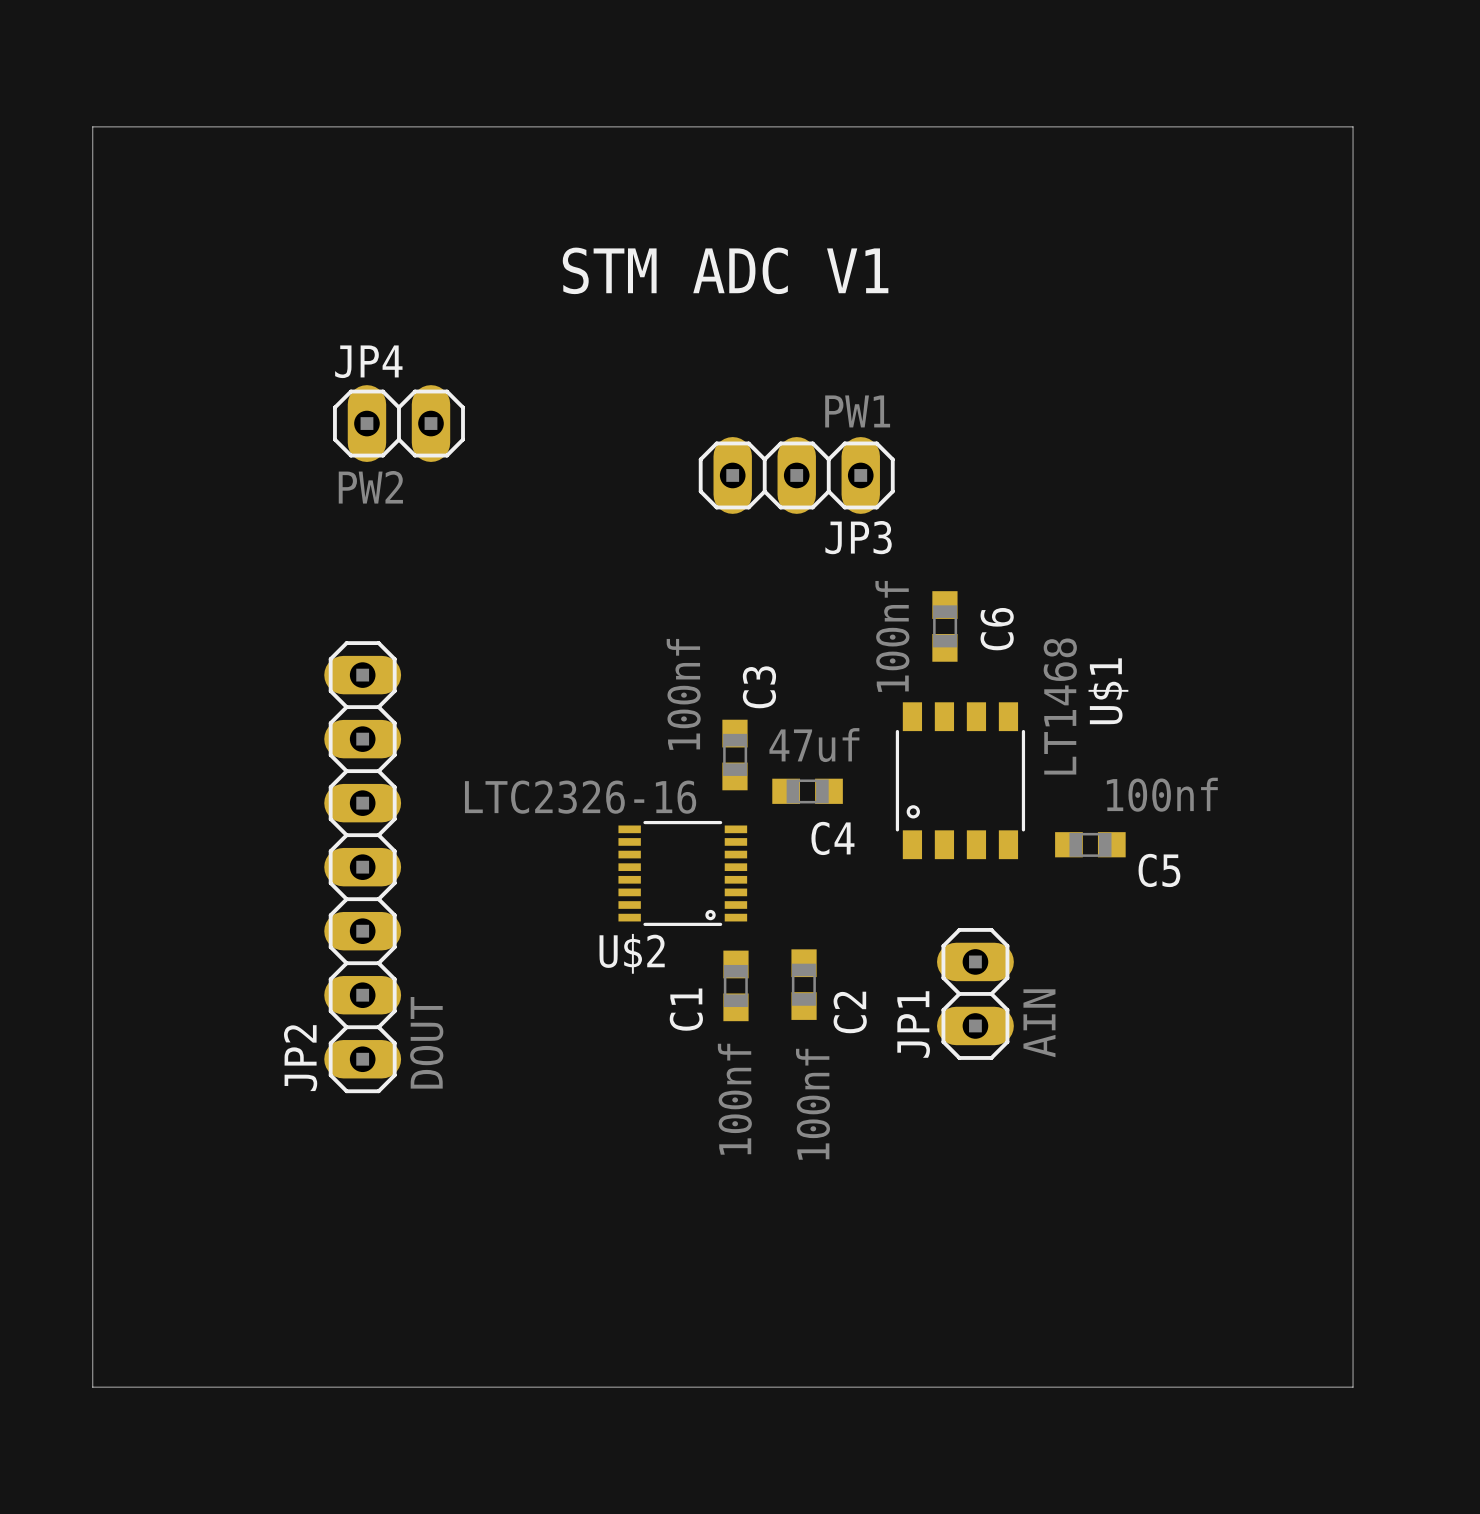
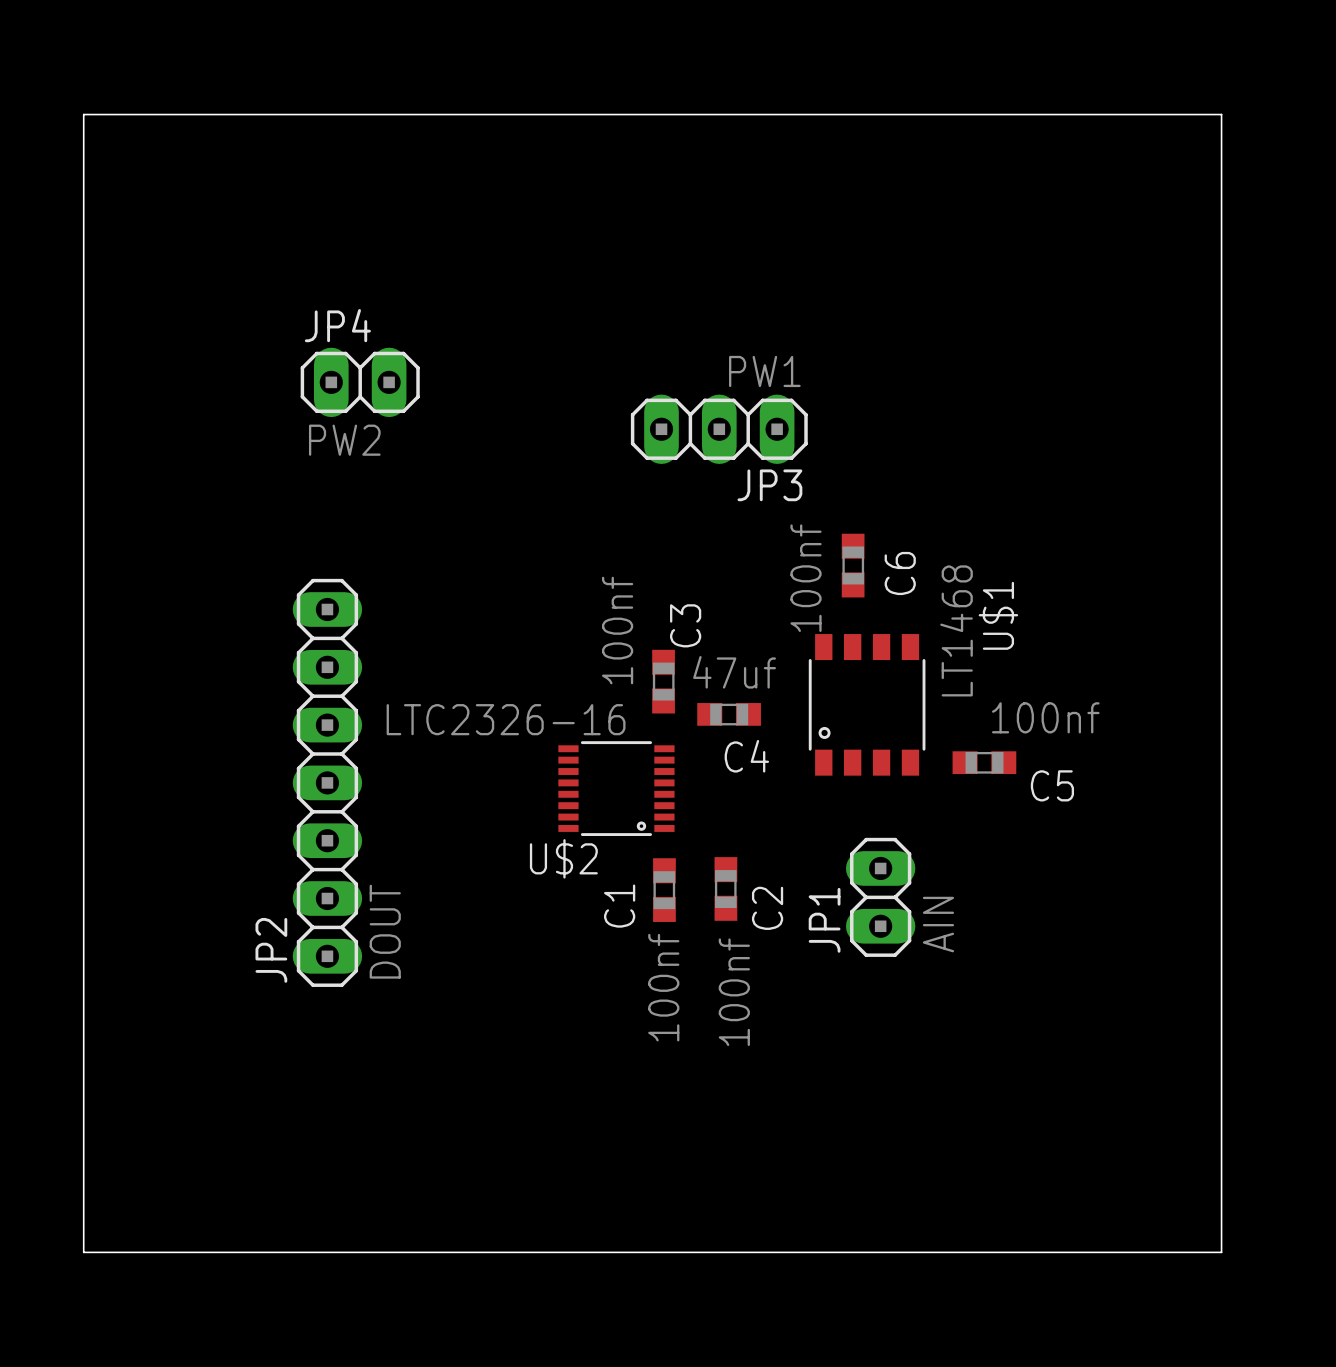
text: STM ADC V1 (725, 270) -> none

